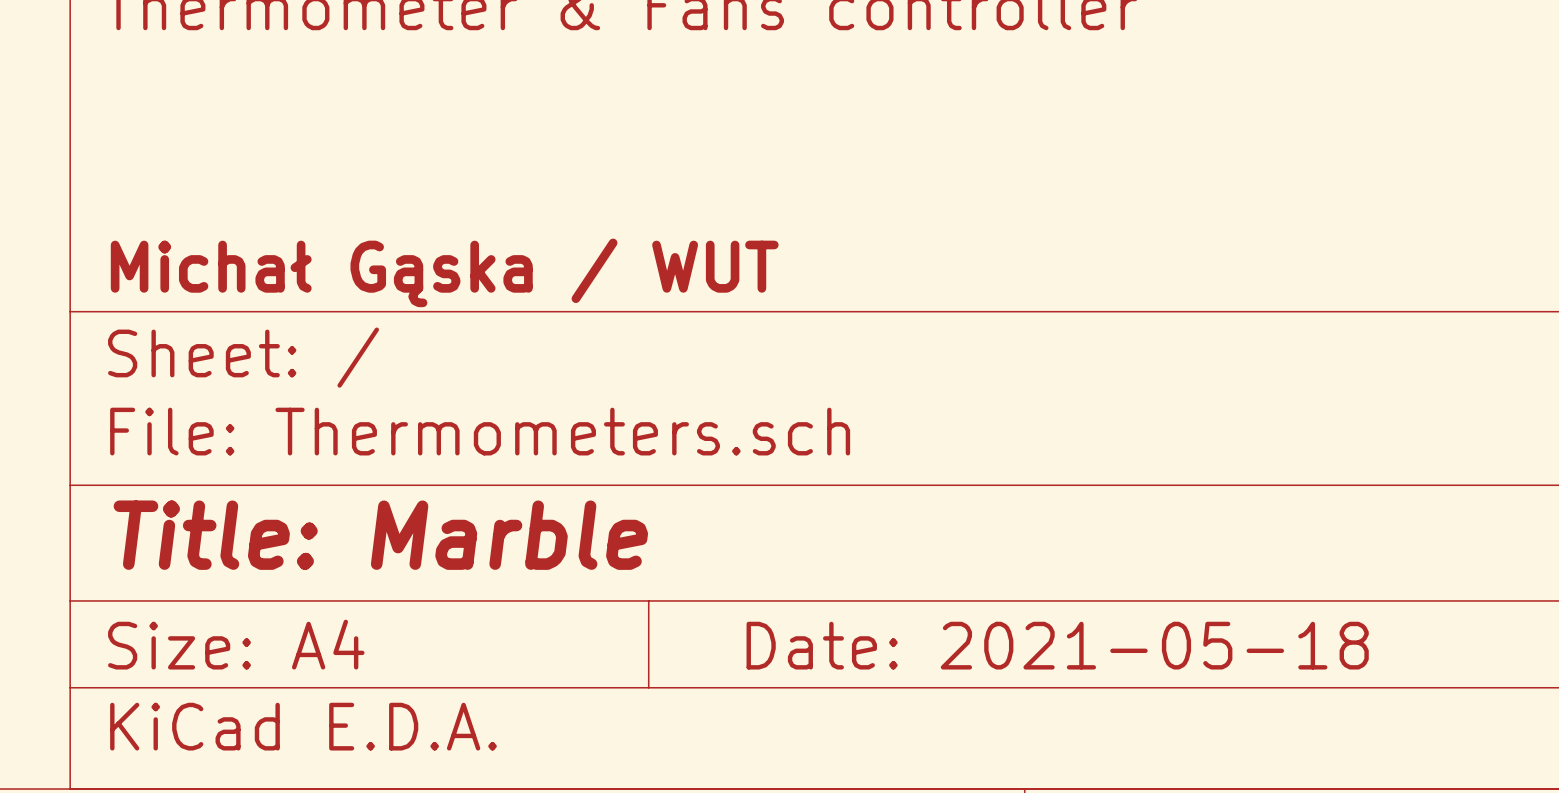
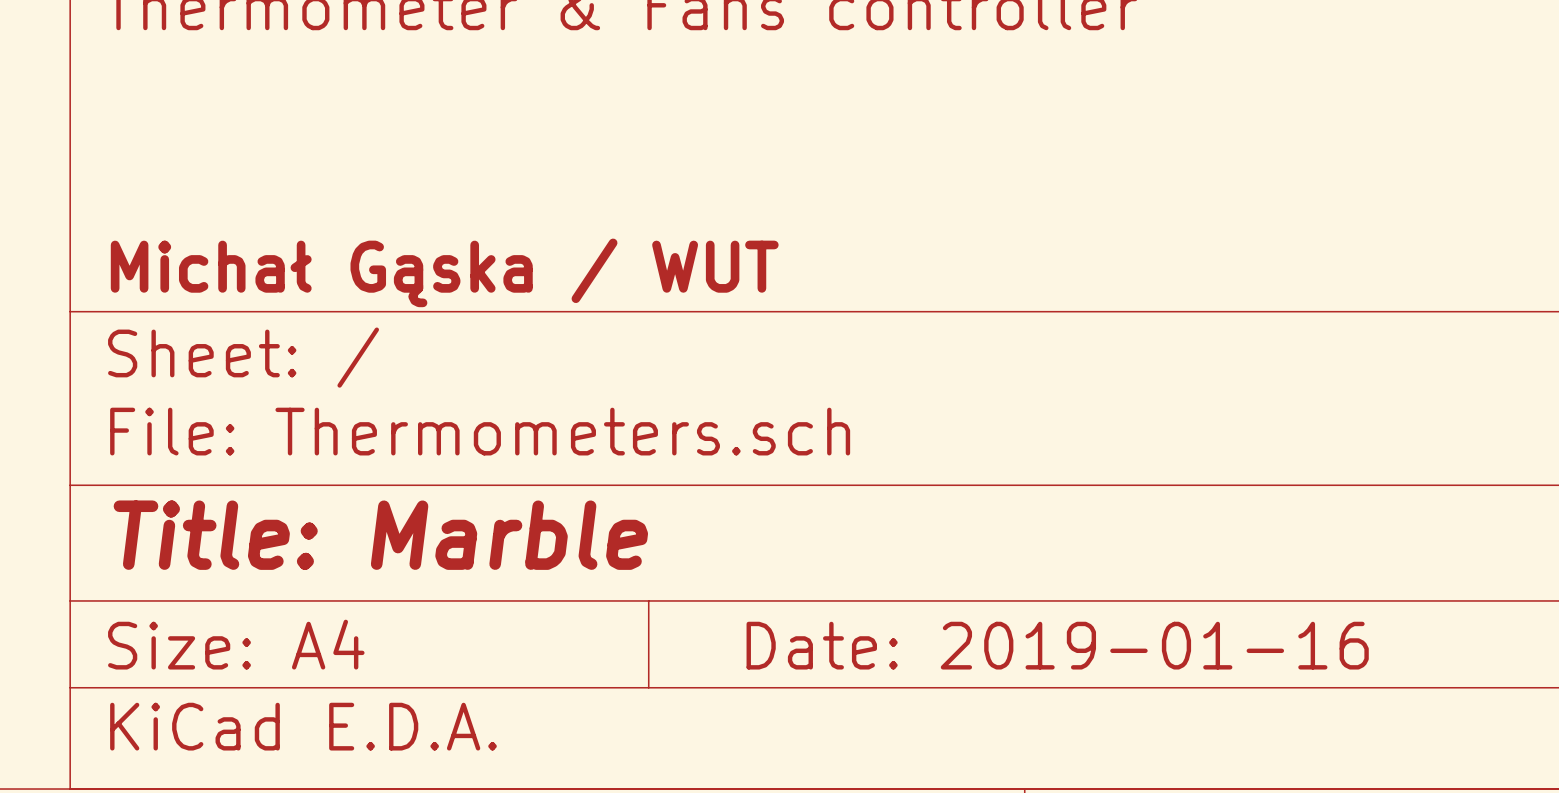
title block: Date: 2021-05-18 (1057, 645) -> Date: 2019-01-16 (1057, 645)

